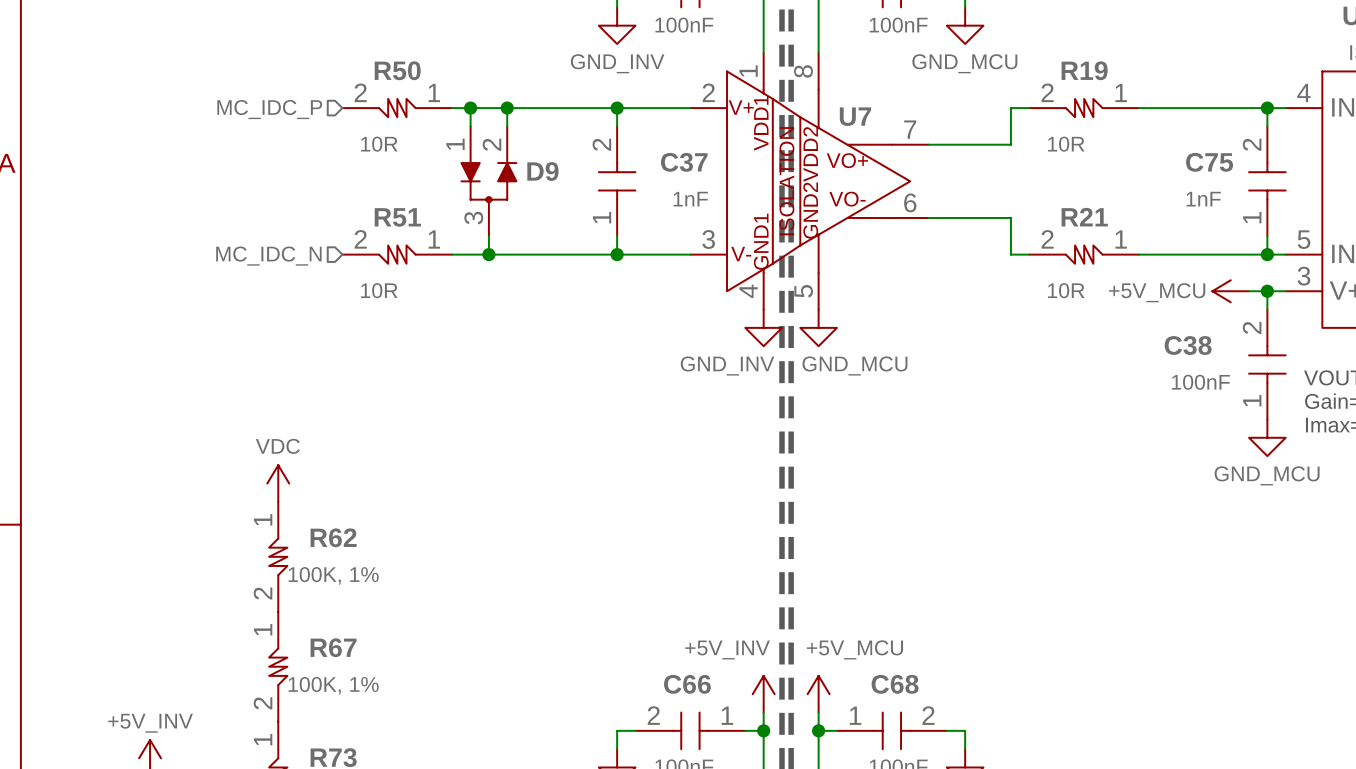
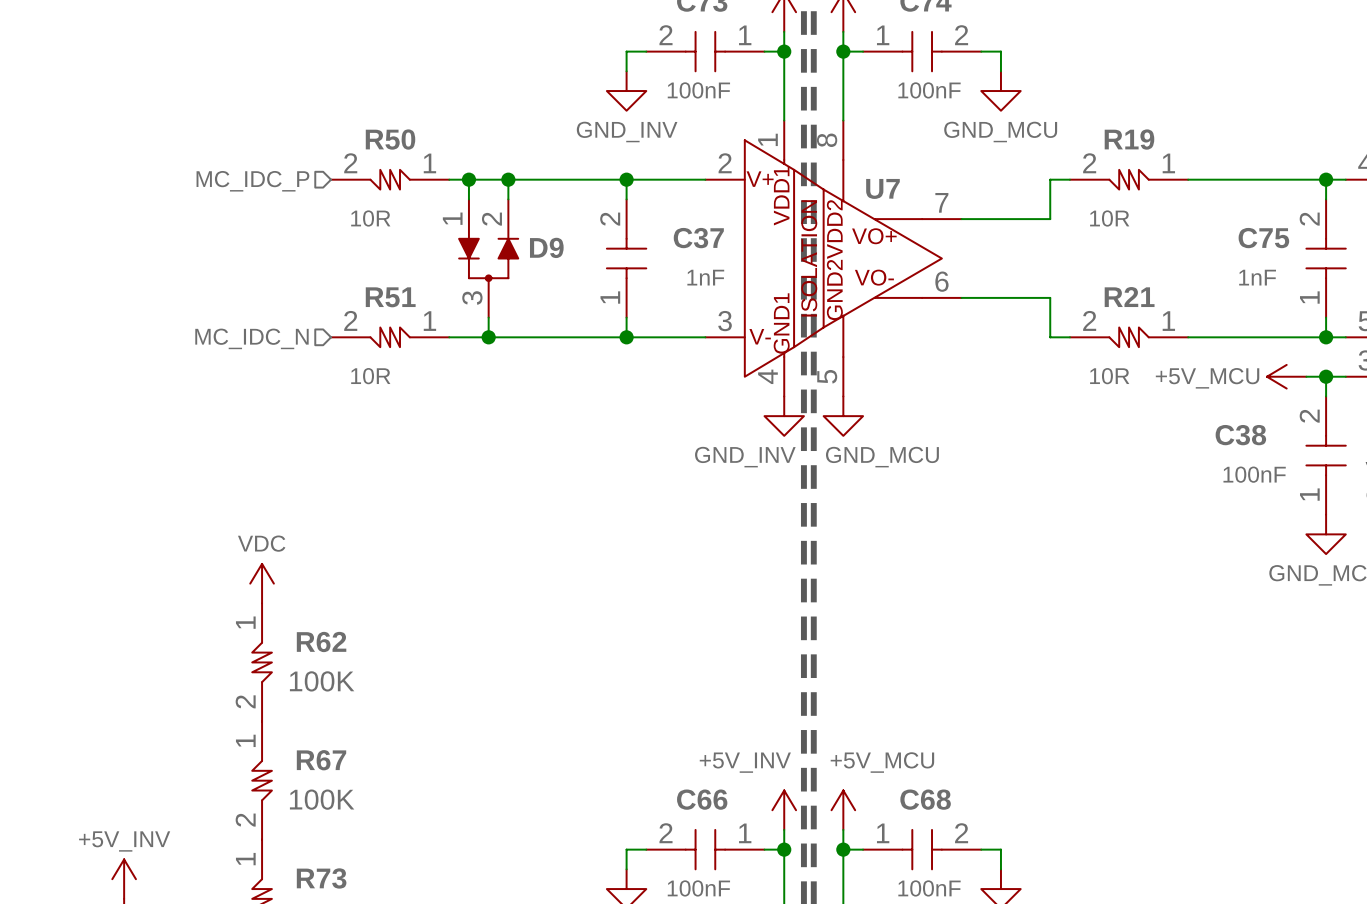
R62 value: 100K, 1% (333, 575) -> 100K (322, 681)
R67 value: 100K, 1% (333, 685) -> 100K (322, 799)

